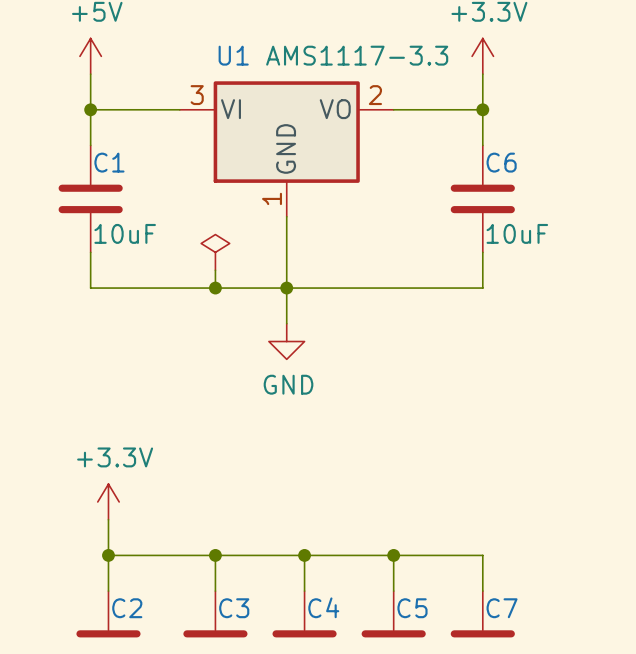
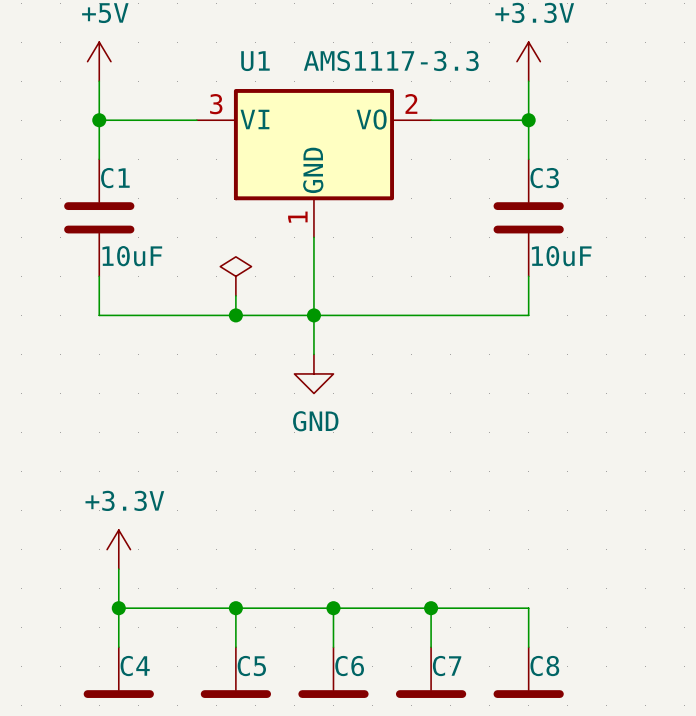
C6 name: C6 (501, 162) -> C3 (544, 178)
C4 name: C4 (323, 607) -> C6 (349, 666)
C2 name: C2 (127, 608) -> C4 (135, 666)
C3 name: C3 (234, 608) -> C5 (251, 666)
C5 name: C5 (412, 608) -> C7 (447, 666)
C7 name: C7 (502, 608) -> C8 (544, 666)

